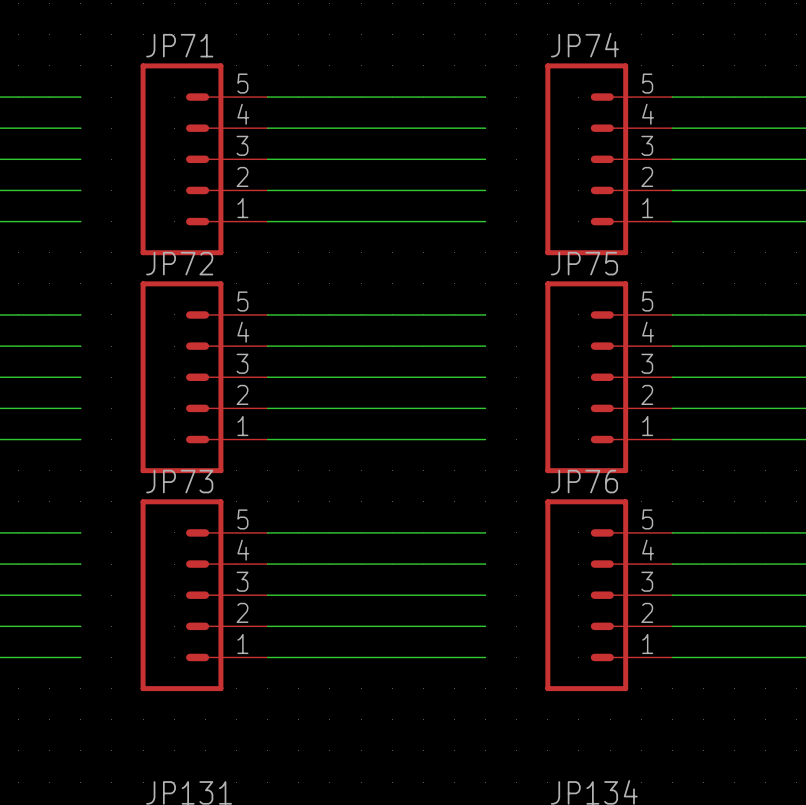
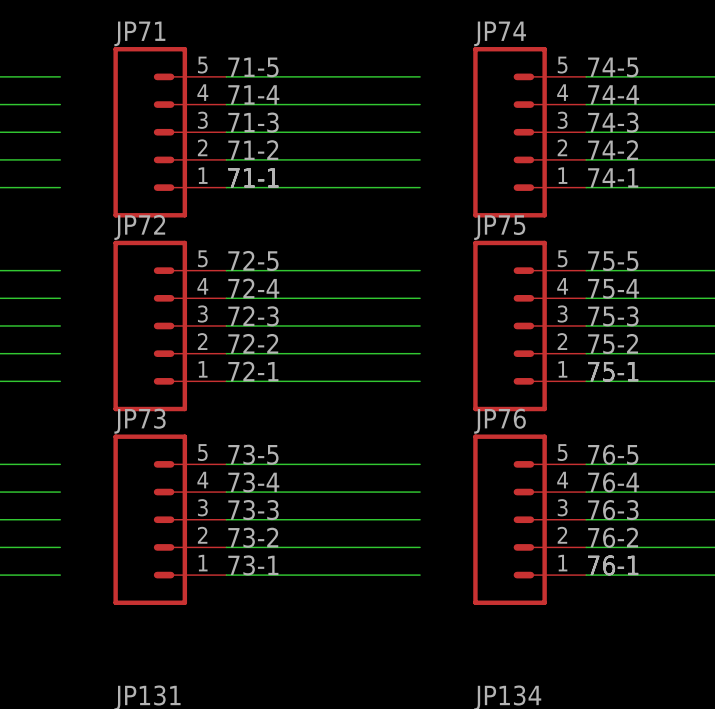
label: none -> 74-5 (613, 67)
label: none -> 71-5 (253, 67)
label: none -> 71-4 (253, 94)
label: none -> 74-4 (613, 94)
label: none -> 74-3 (613, 122)
label: none -> 71-3 (253, 122)
label: none -> 71-2 (253, 150)
label: none -> 74-2 (613, 150)
label: none -> 71-1 (253, 177)
label: none -> 74-1 (613, 177)
label: none -> 72-5 (253, 260)
label: none -> 75-5 (613, 261)
label: none -> 72-4 (253, 288)
label: none -> 75-4 (613, 288)
label: none -> 72-3 (253, 316)
label: none -> 75-3 (613, 316)
label: none -> 72-2 (253, 343)
label: none -> 75-2 (613, 343)
label: none -> 72-1 (253, 371)
label: none -> 75-1 (613, 371)
label: none -> 73-5 (253, 454)
label: none -> 76-5 (613, 454)
label: none -> 73-4 (253, 482)
label: none -> 76-4 (613, 482)
label: none -> 73-3 (253, 510)
label: none -> 76-3 (613, 510)
label: none -> 73-2 (253, 537)
label: none -> 76-2 (613, 537)
label: none -> 73-1 (253, 565)
label: none -> 76-1 (613, 565)

